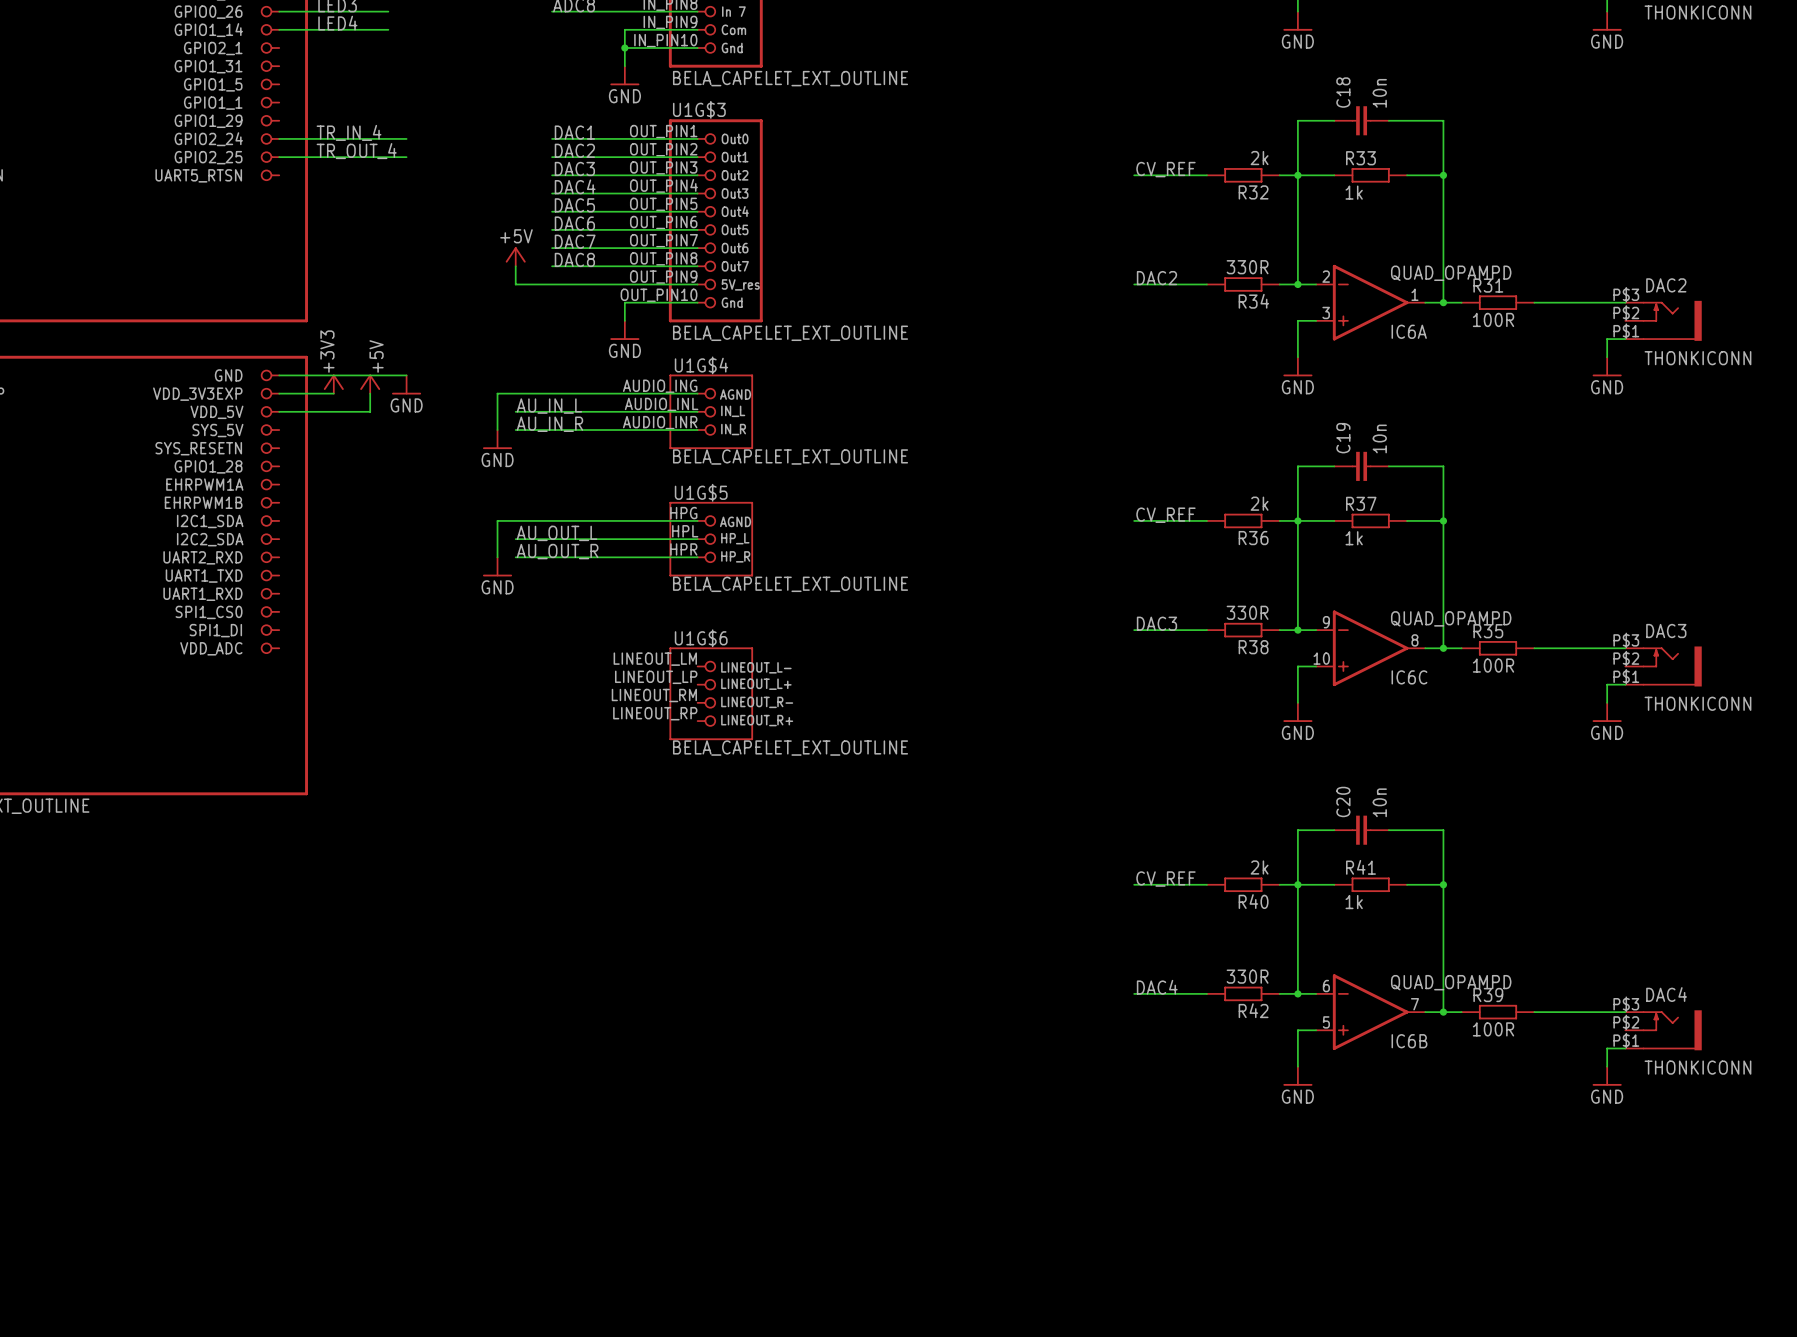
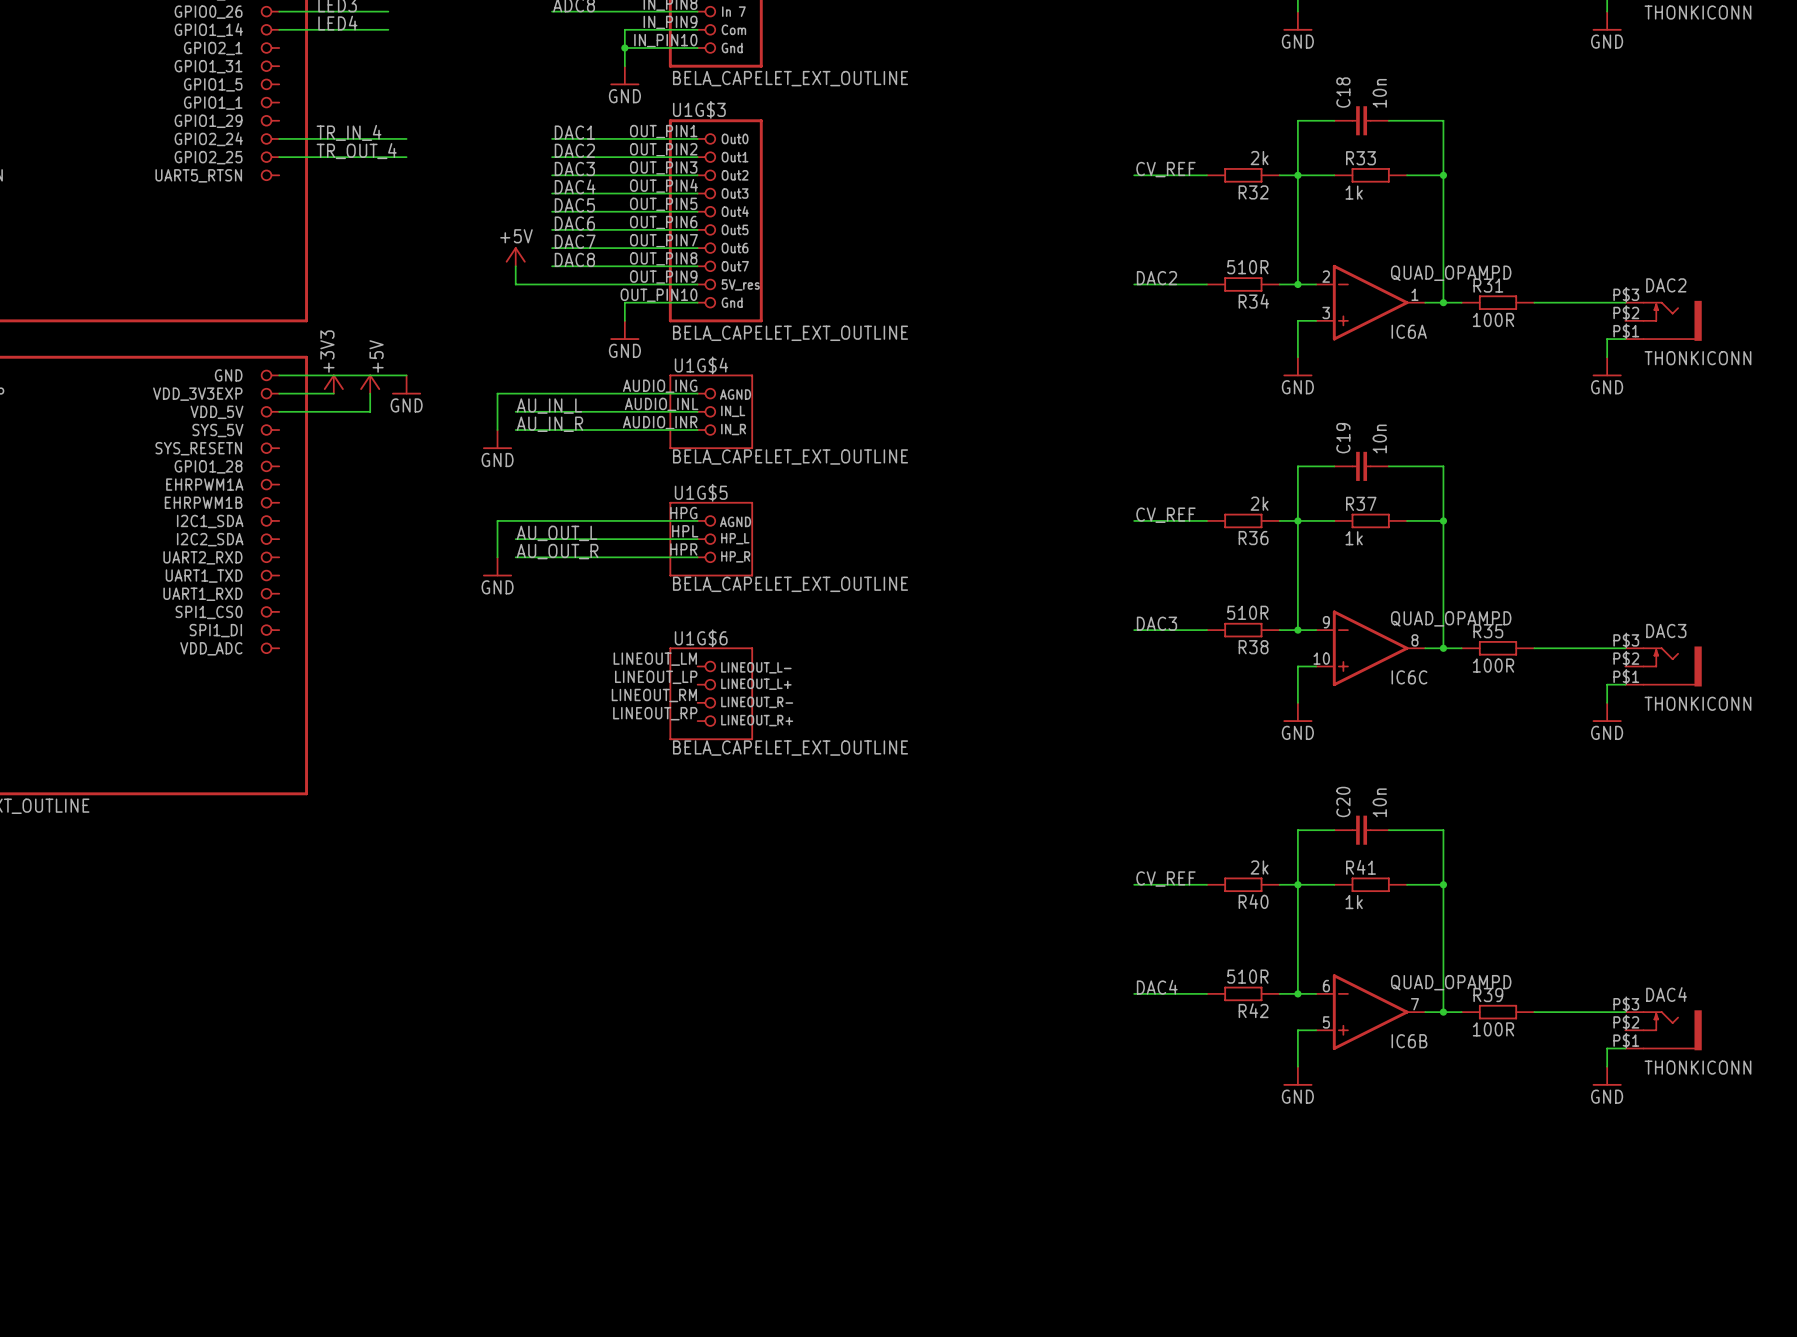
R34 value: 330R (1247, 267) -> 510R (1247, 267)
R38 value: 330R (1247, 612) -> 510R (1247, 612)
R42 value: 330R (1247, 976) -> 510R (1247, 976)

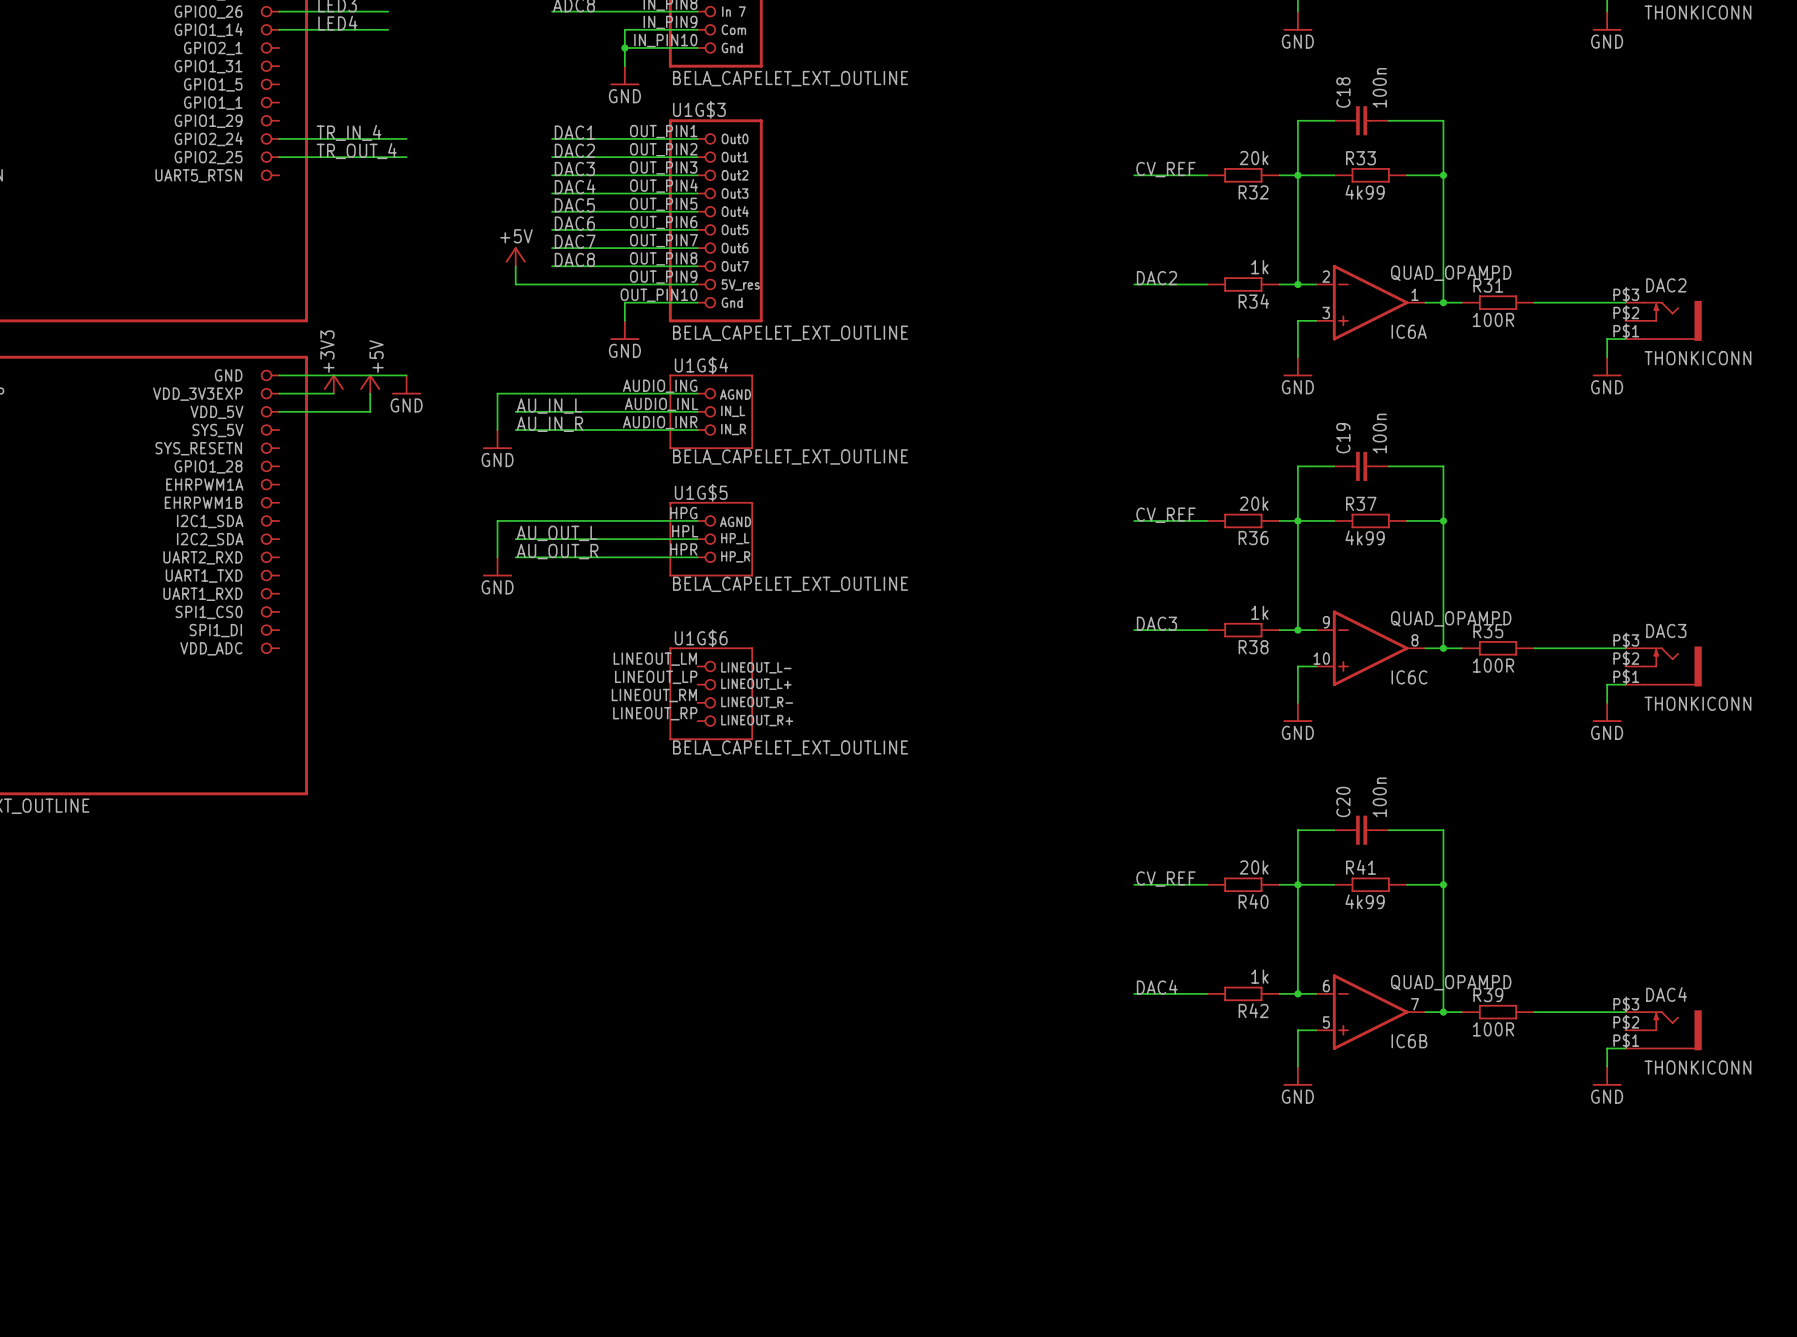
C18 value: 10n (1379, 93) -> 100n (1379, 87)
R32 value: 2k (1259, 158) -> 20k (1254, 158)
R33 value: 1k (1354, 192) -> 4k99 (1365, 192)
R34 value: 510R (1247, 267) -> 1k (1259, 267)
C19 value: 10n (1379, 438) -> 100n (1379, 433)
R36 value: 2k (1259, 503) -> 20k (1254, 503)
R37 value: 1k (1354, 538) -> 4k99 (1365, 537)
R38 value: 510R (1247, 612) -> 1k (1259, 612)
C20 value: 10n (1379, 802) -> 100n (1379, 797)
R40 value: 2k (1259, 867) -> 20k (1254, 867)
R41 value: 1k (1354, 902) -> 4k99 (1365, 901)
R42 value: 510R (1247, 976) -> 1k (1259, 976)

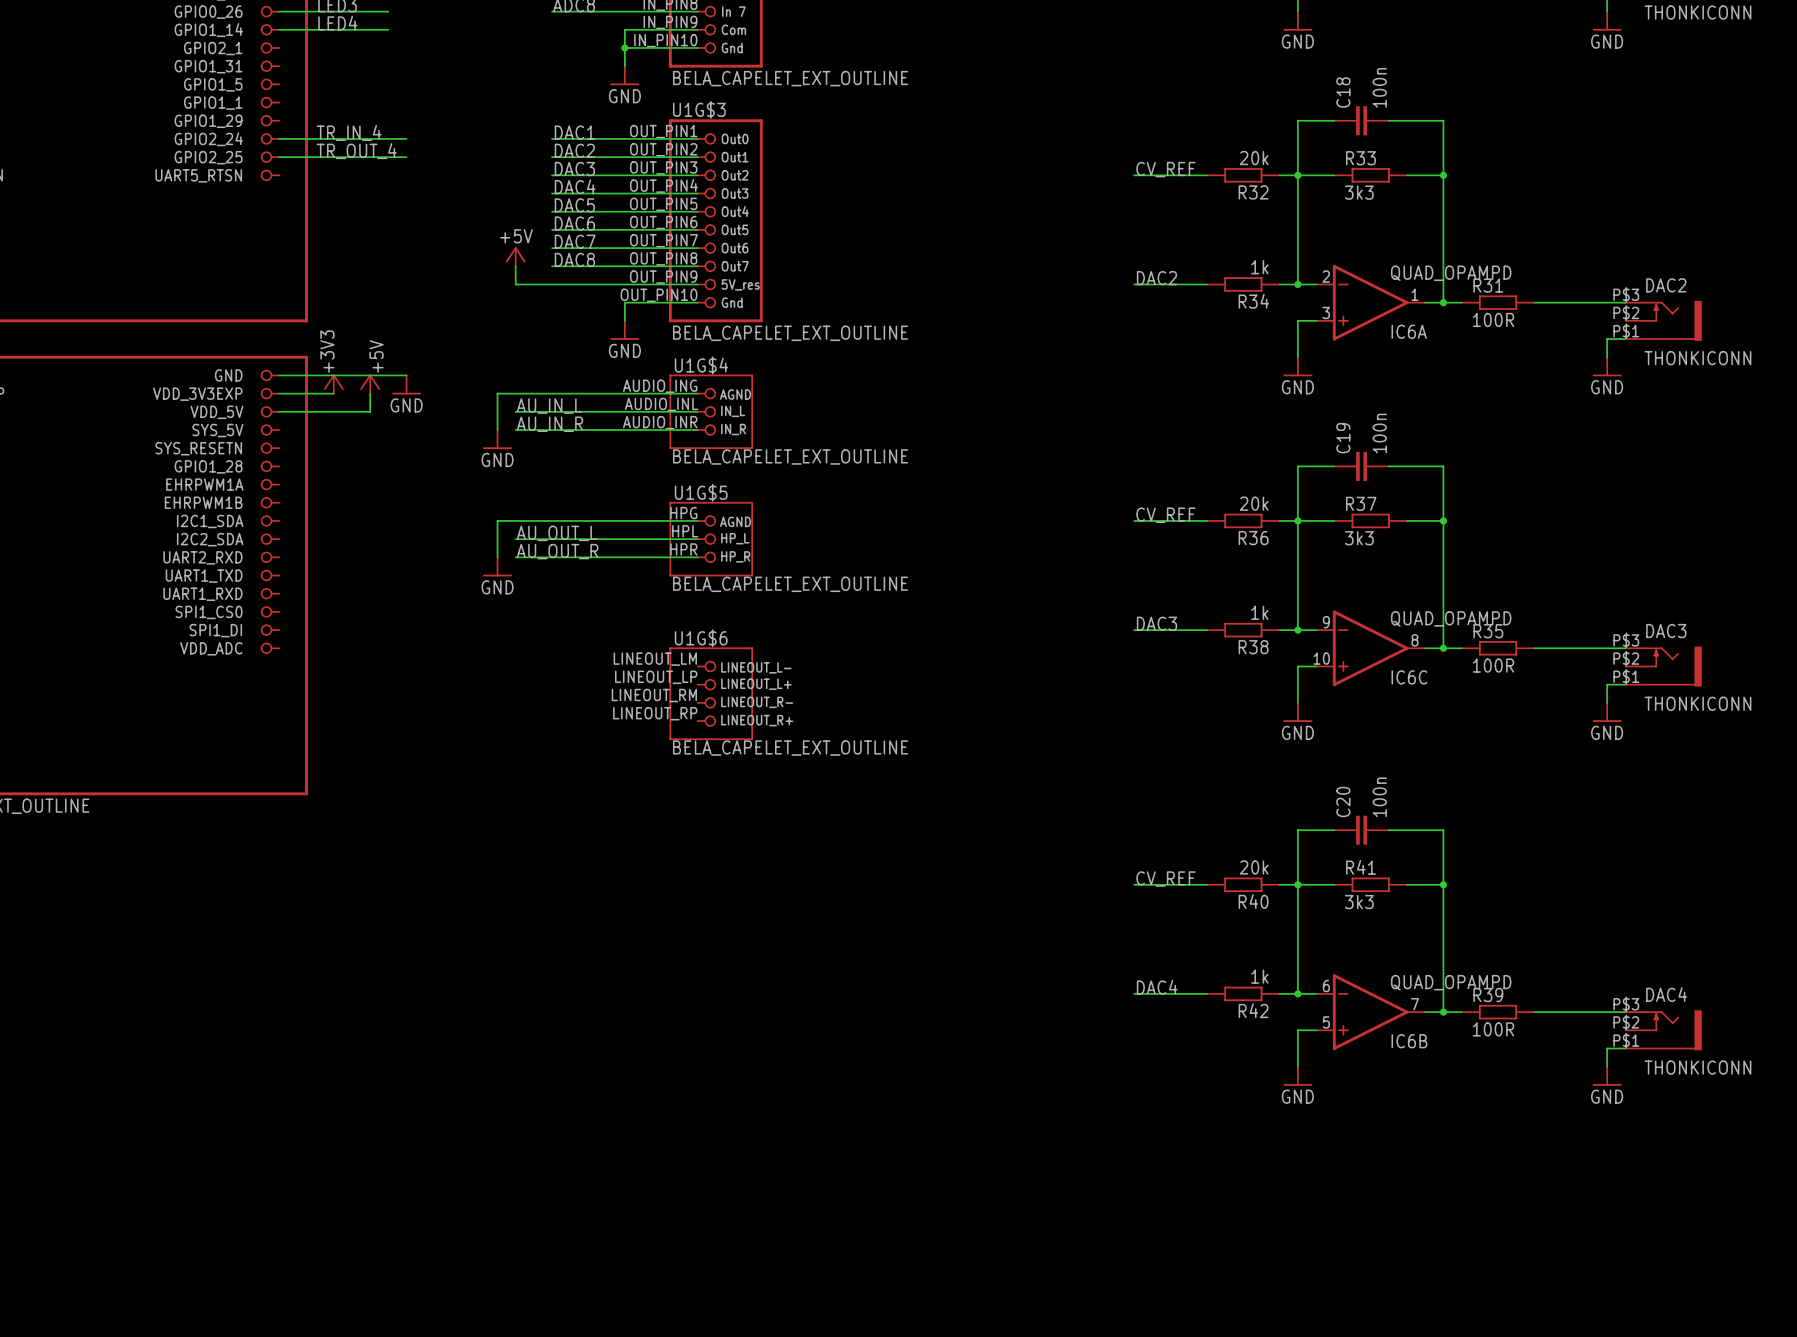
R33 value: 4k99 (1365, 192) -> 3k3 (1359, 192)
R37 value: 4k99 (1365, 537) -> 3k3 (1359, 538)
R41 value: 4k99 (1365, 901) -> 3k3 (1359, 902)

